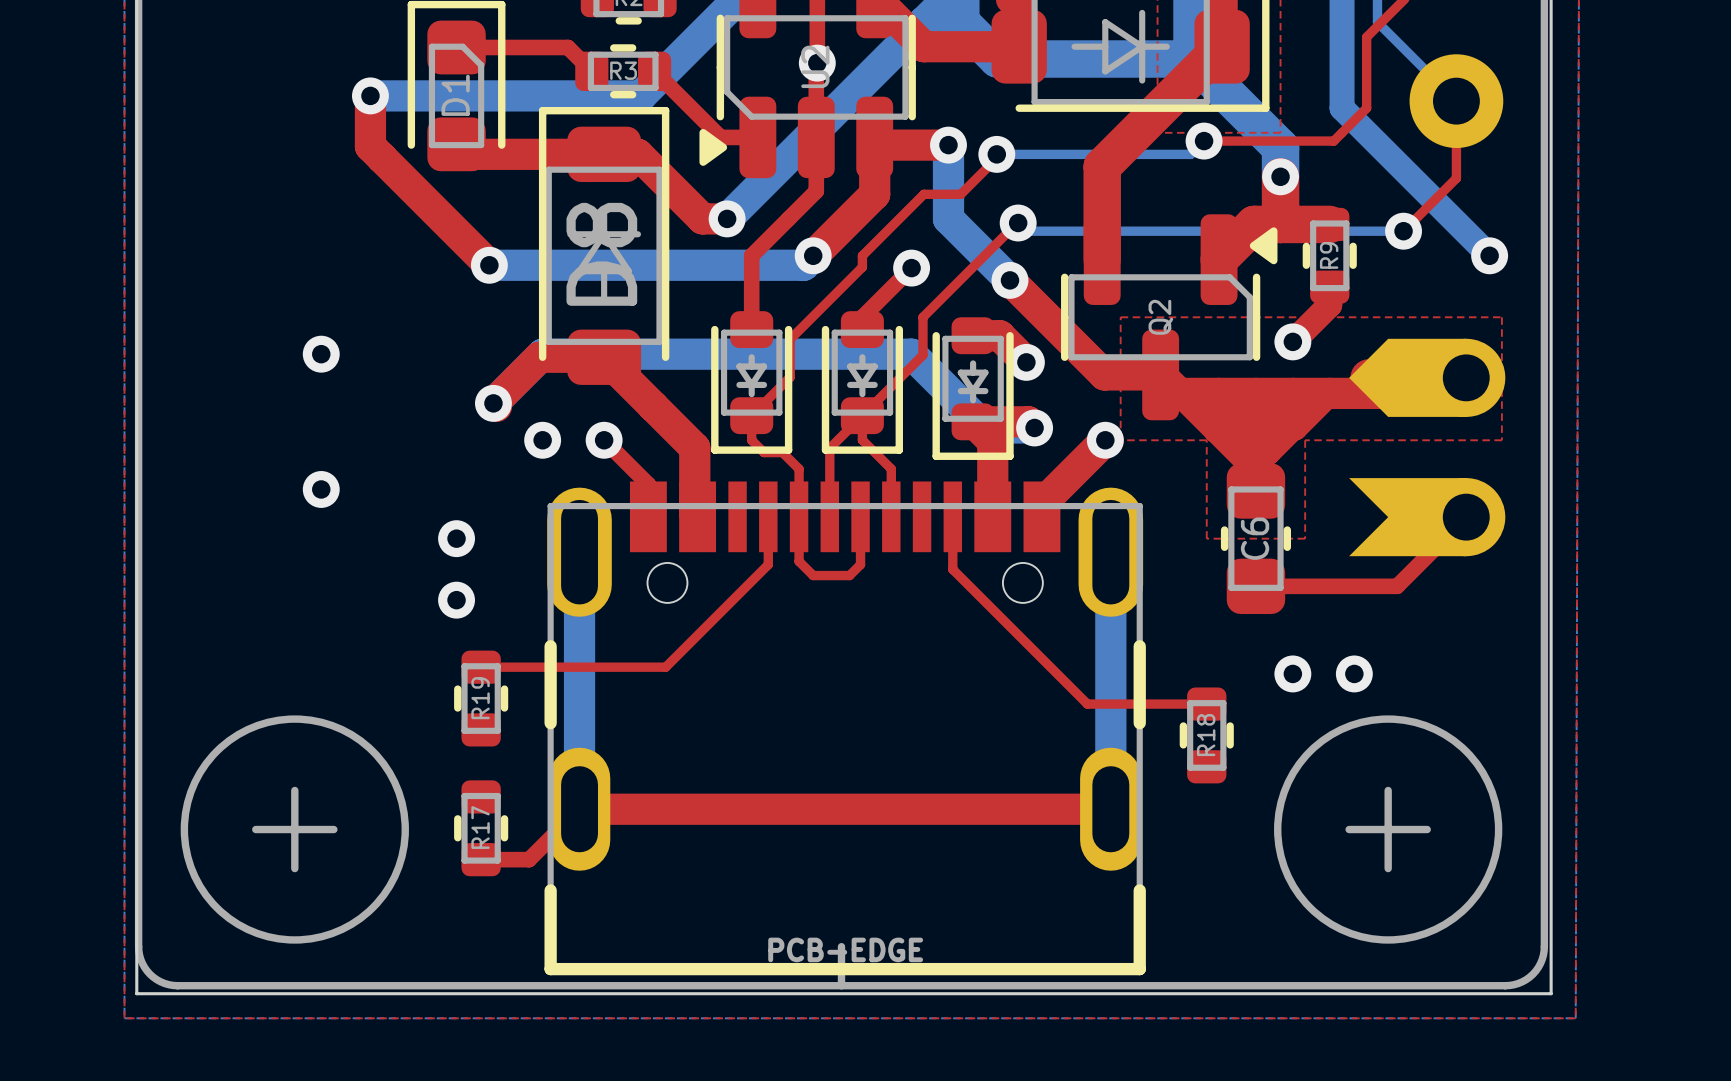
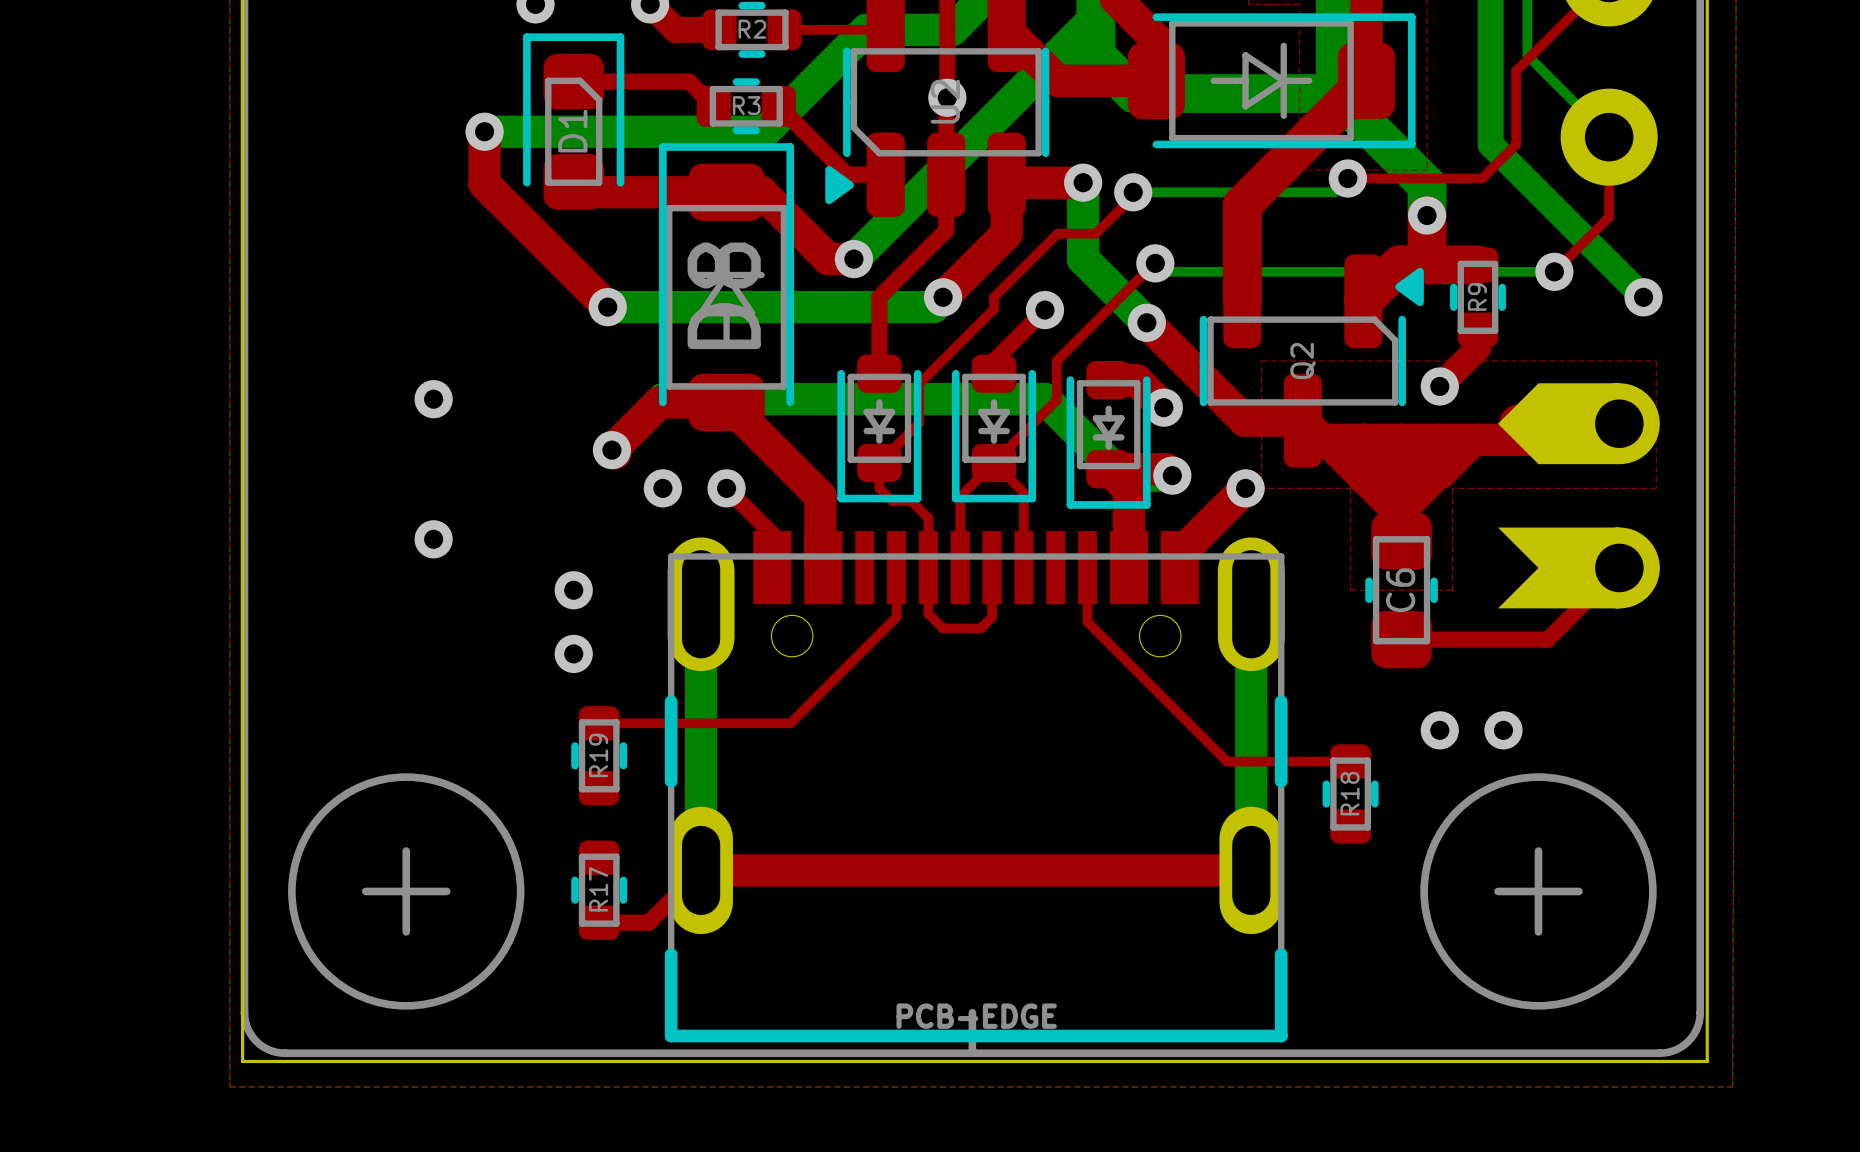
top track: (862, 415) (862, 440) (891, 469) -> (994, 462) (1023, 492) (1023, 518)

